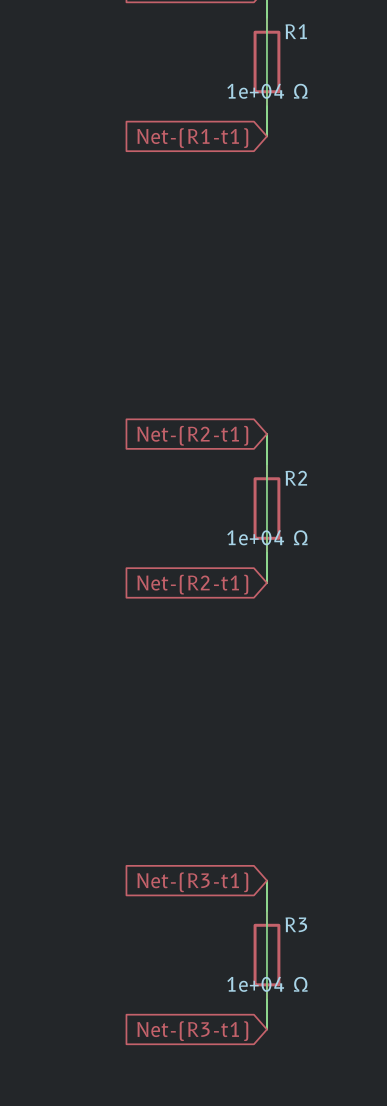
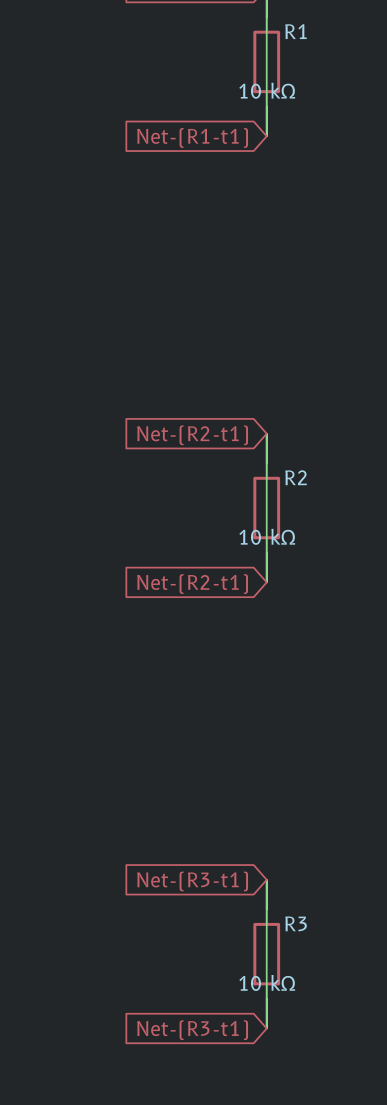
R1 value: 1e+04 Ω (267, 91) -> 10 kΩ (267, 90)
R2 value: 1e+04 Ω (267, 537) -> 10 kΩ (267, 536)
R3 value: 1e+04 Ω (267, 984) -> 10 kΩ (267, 982)

